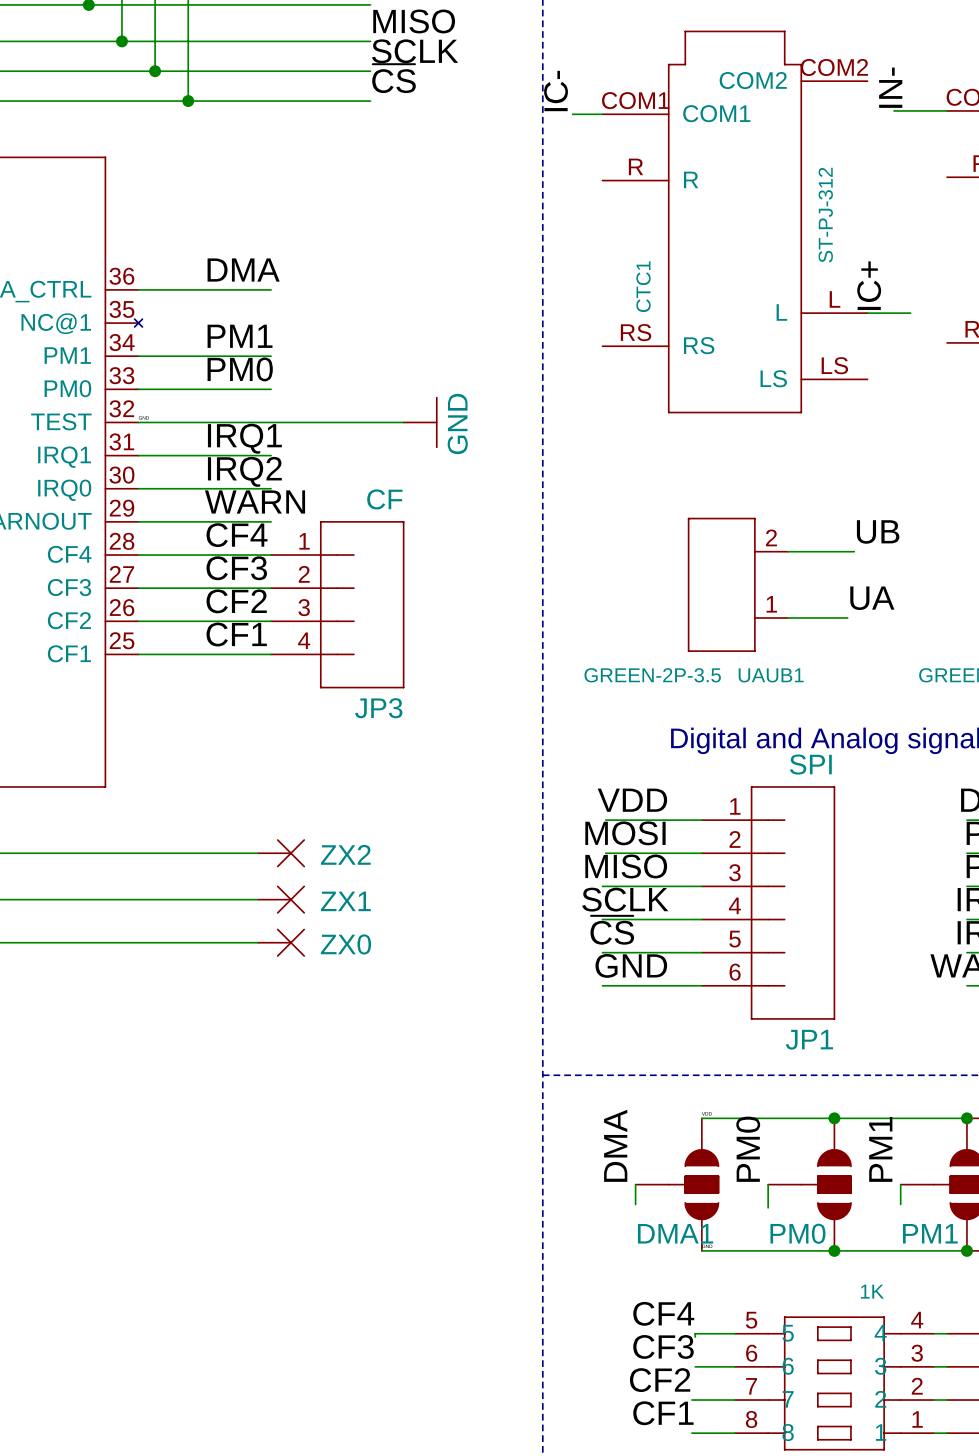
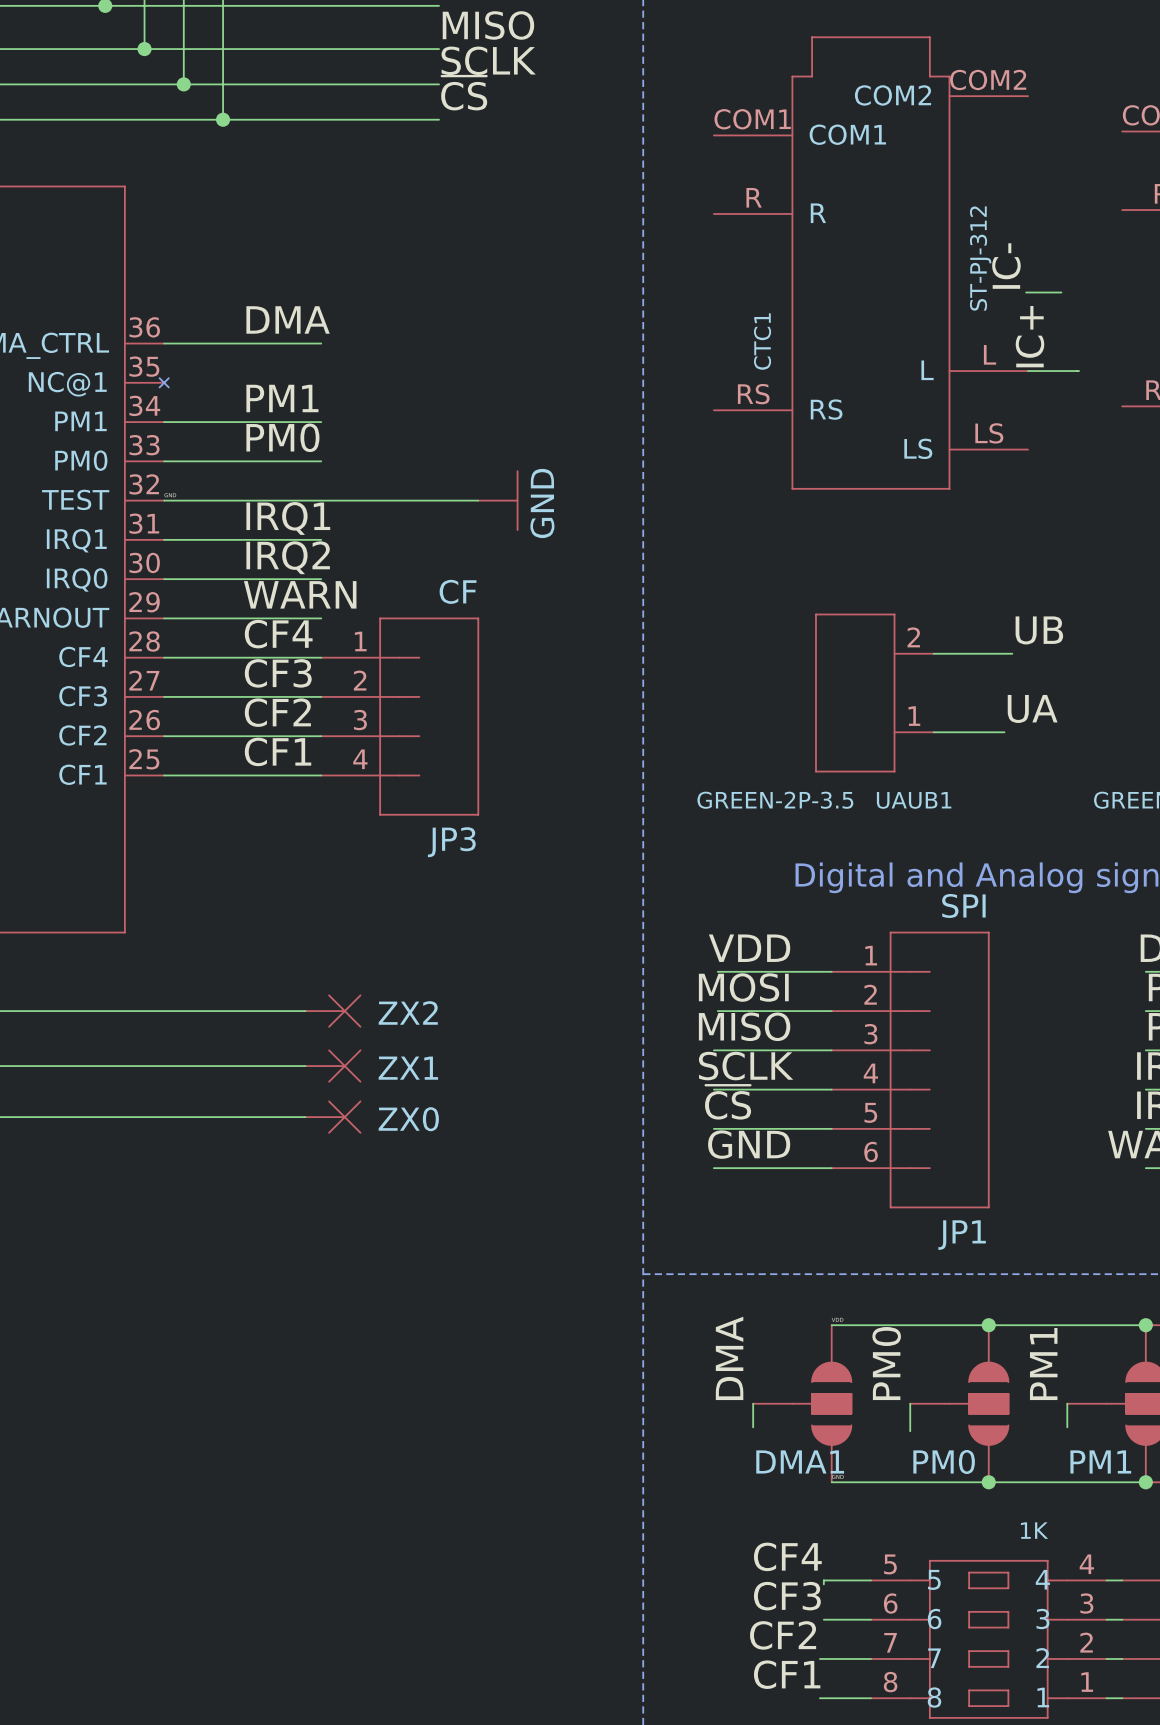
label: IN- (890, 87) -> none
label position: IC- (556, 91) -> IC- (1006, 266)
wire: (894, 110) (947, 110) -> none
wire: (572, 114) (602, 114) -> (1026, 292) (1061, 292)

